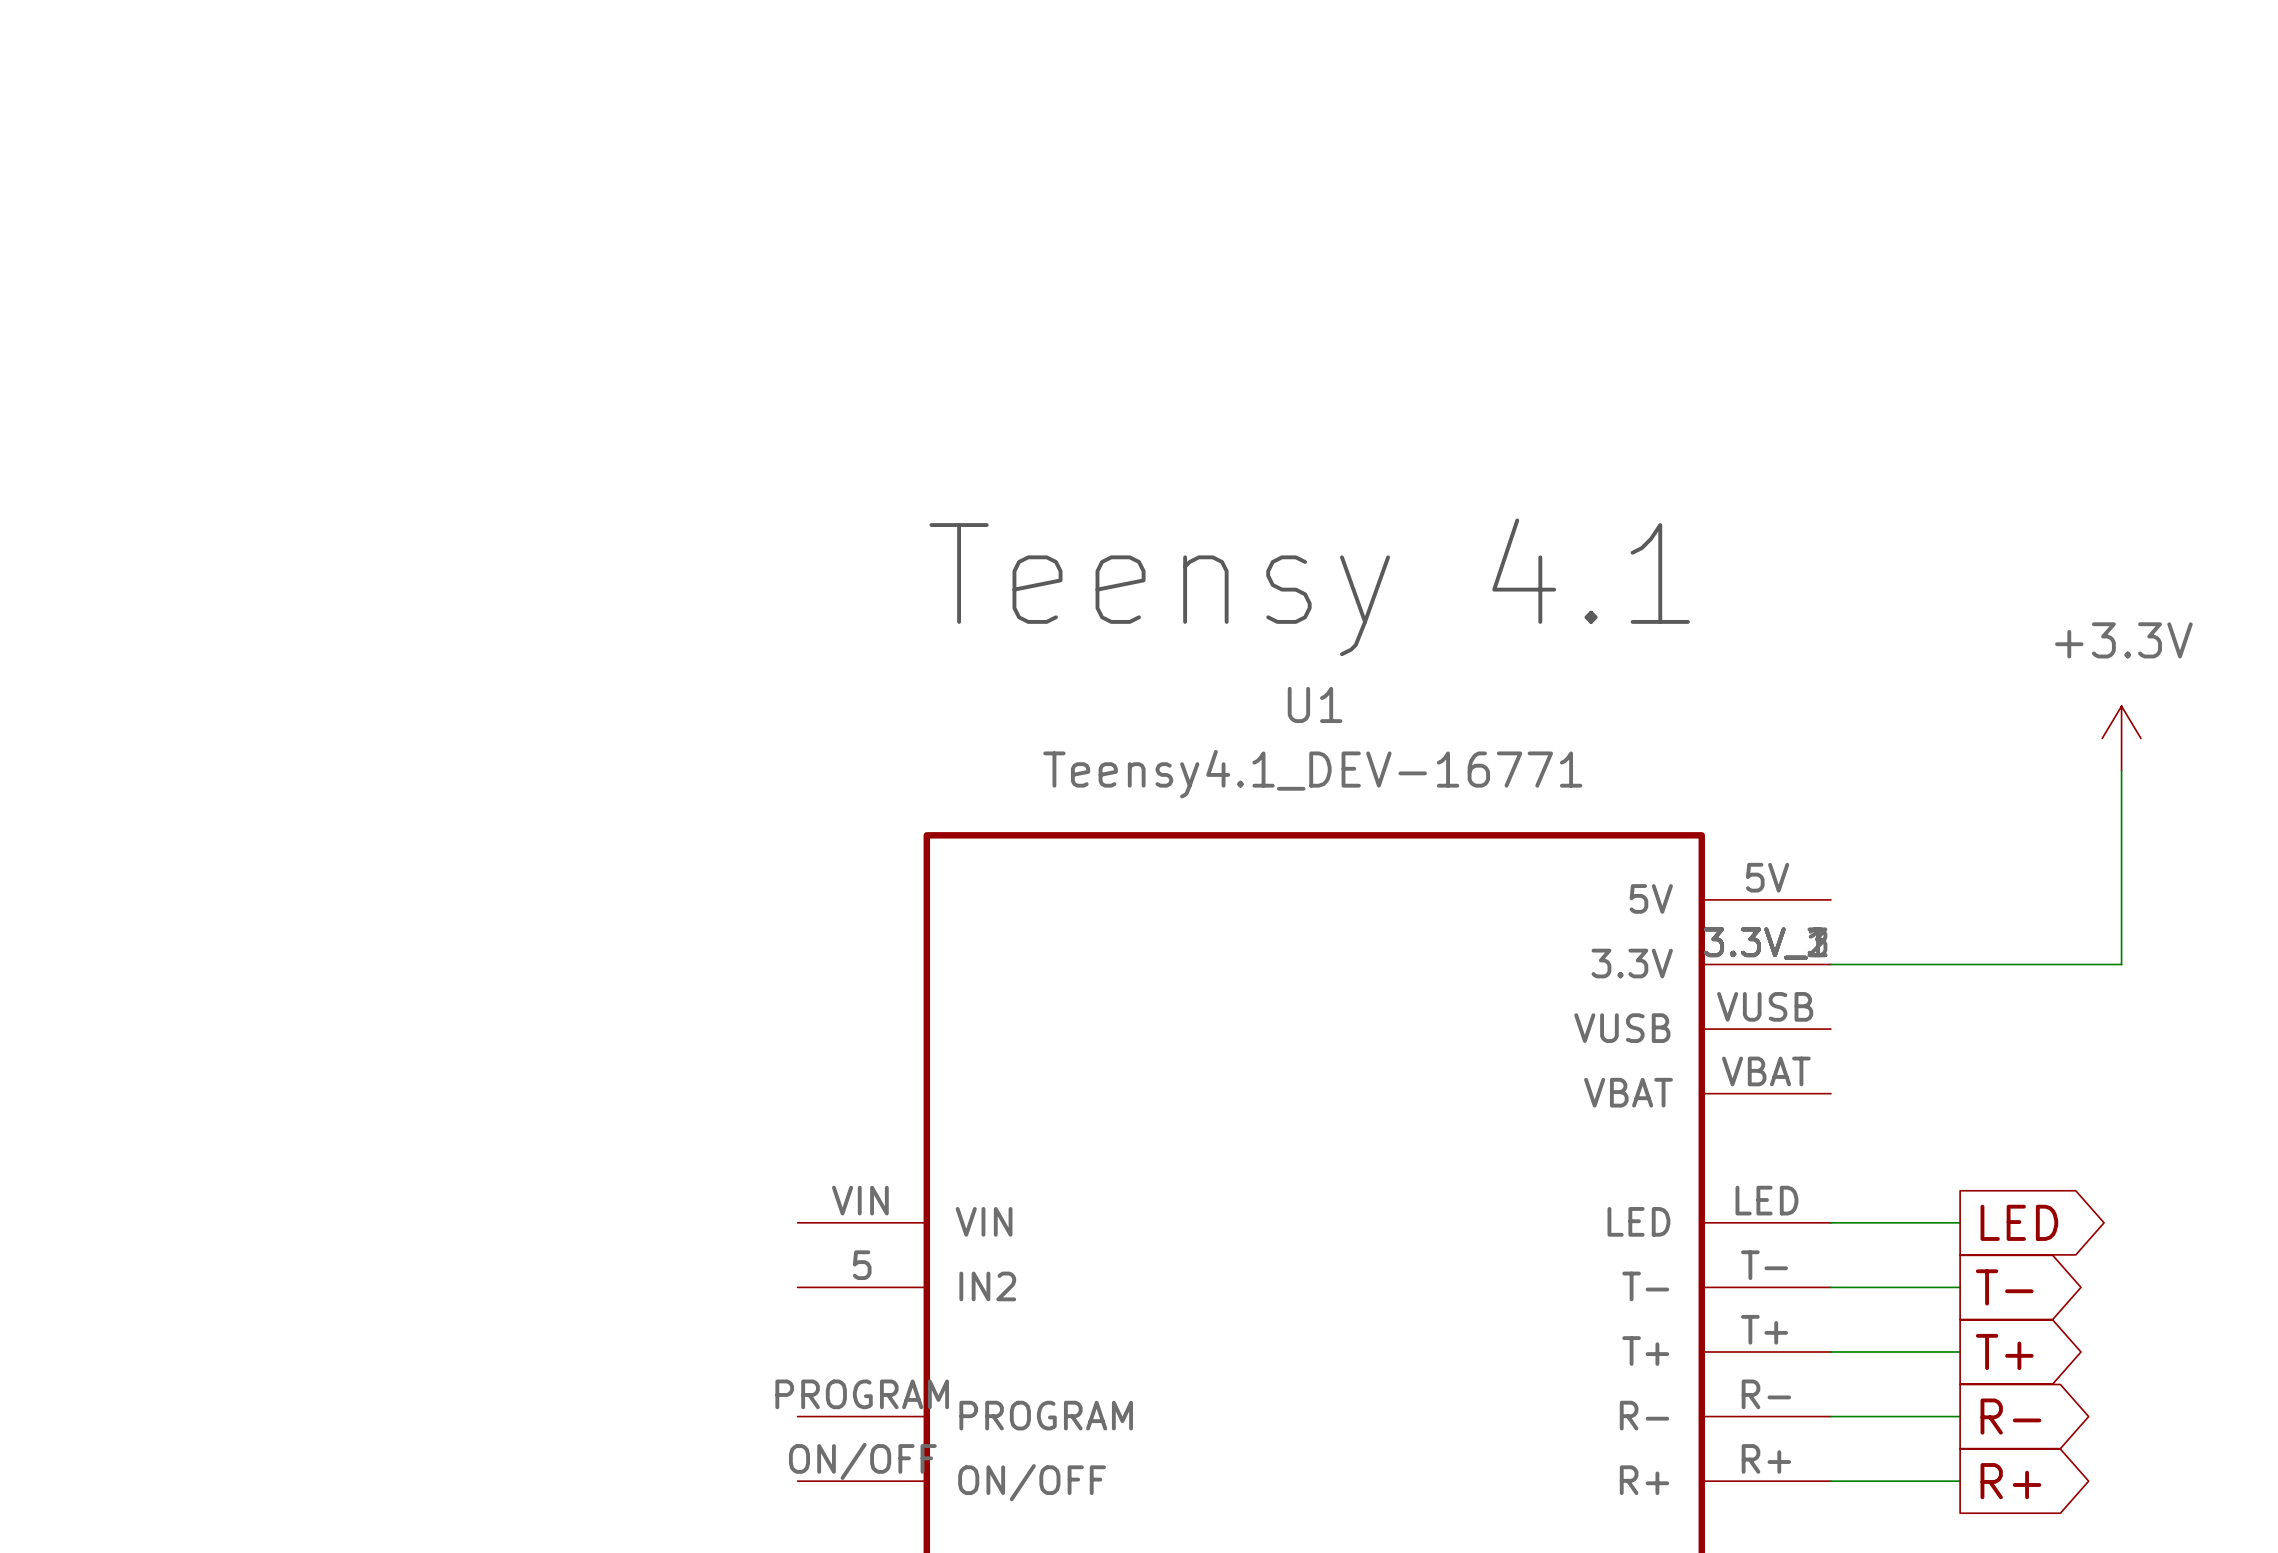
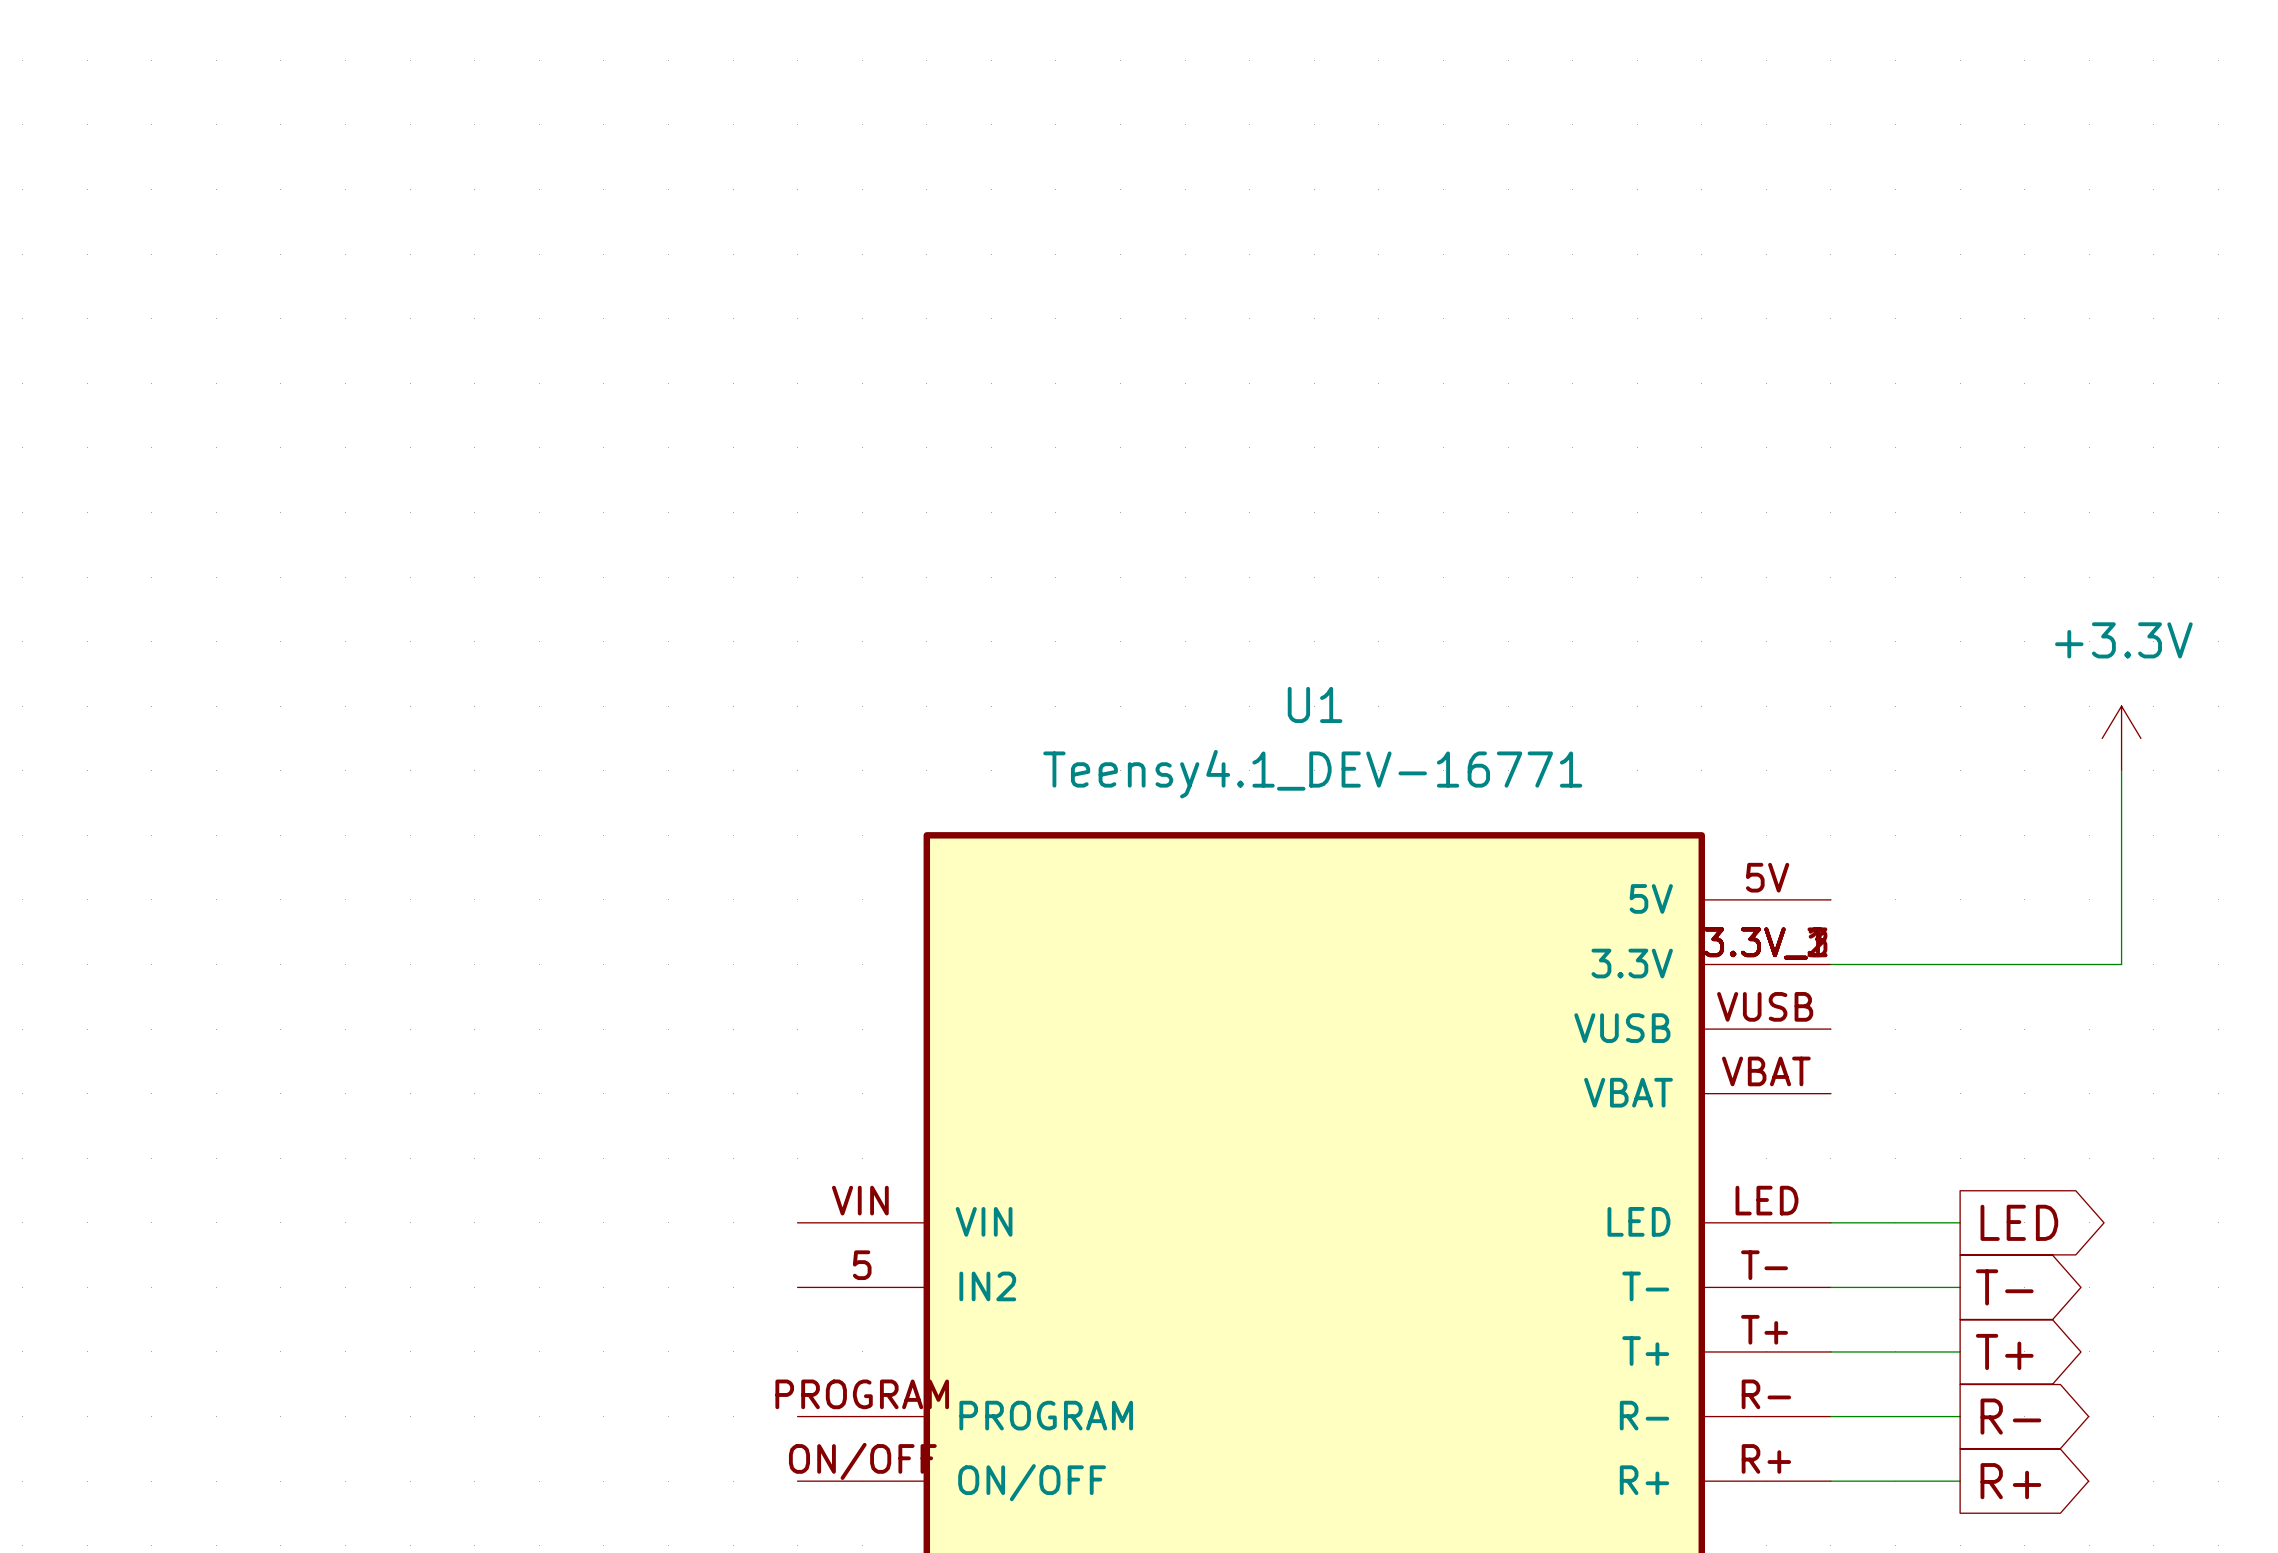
text: Teensy 4.1 (1309, 587) -> none

